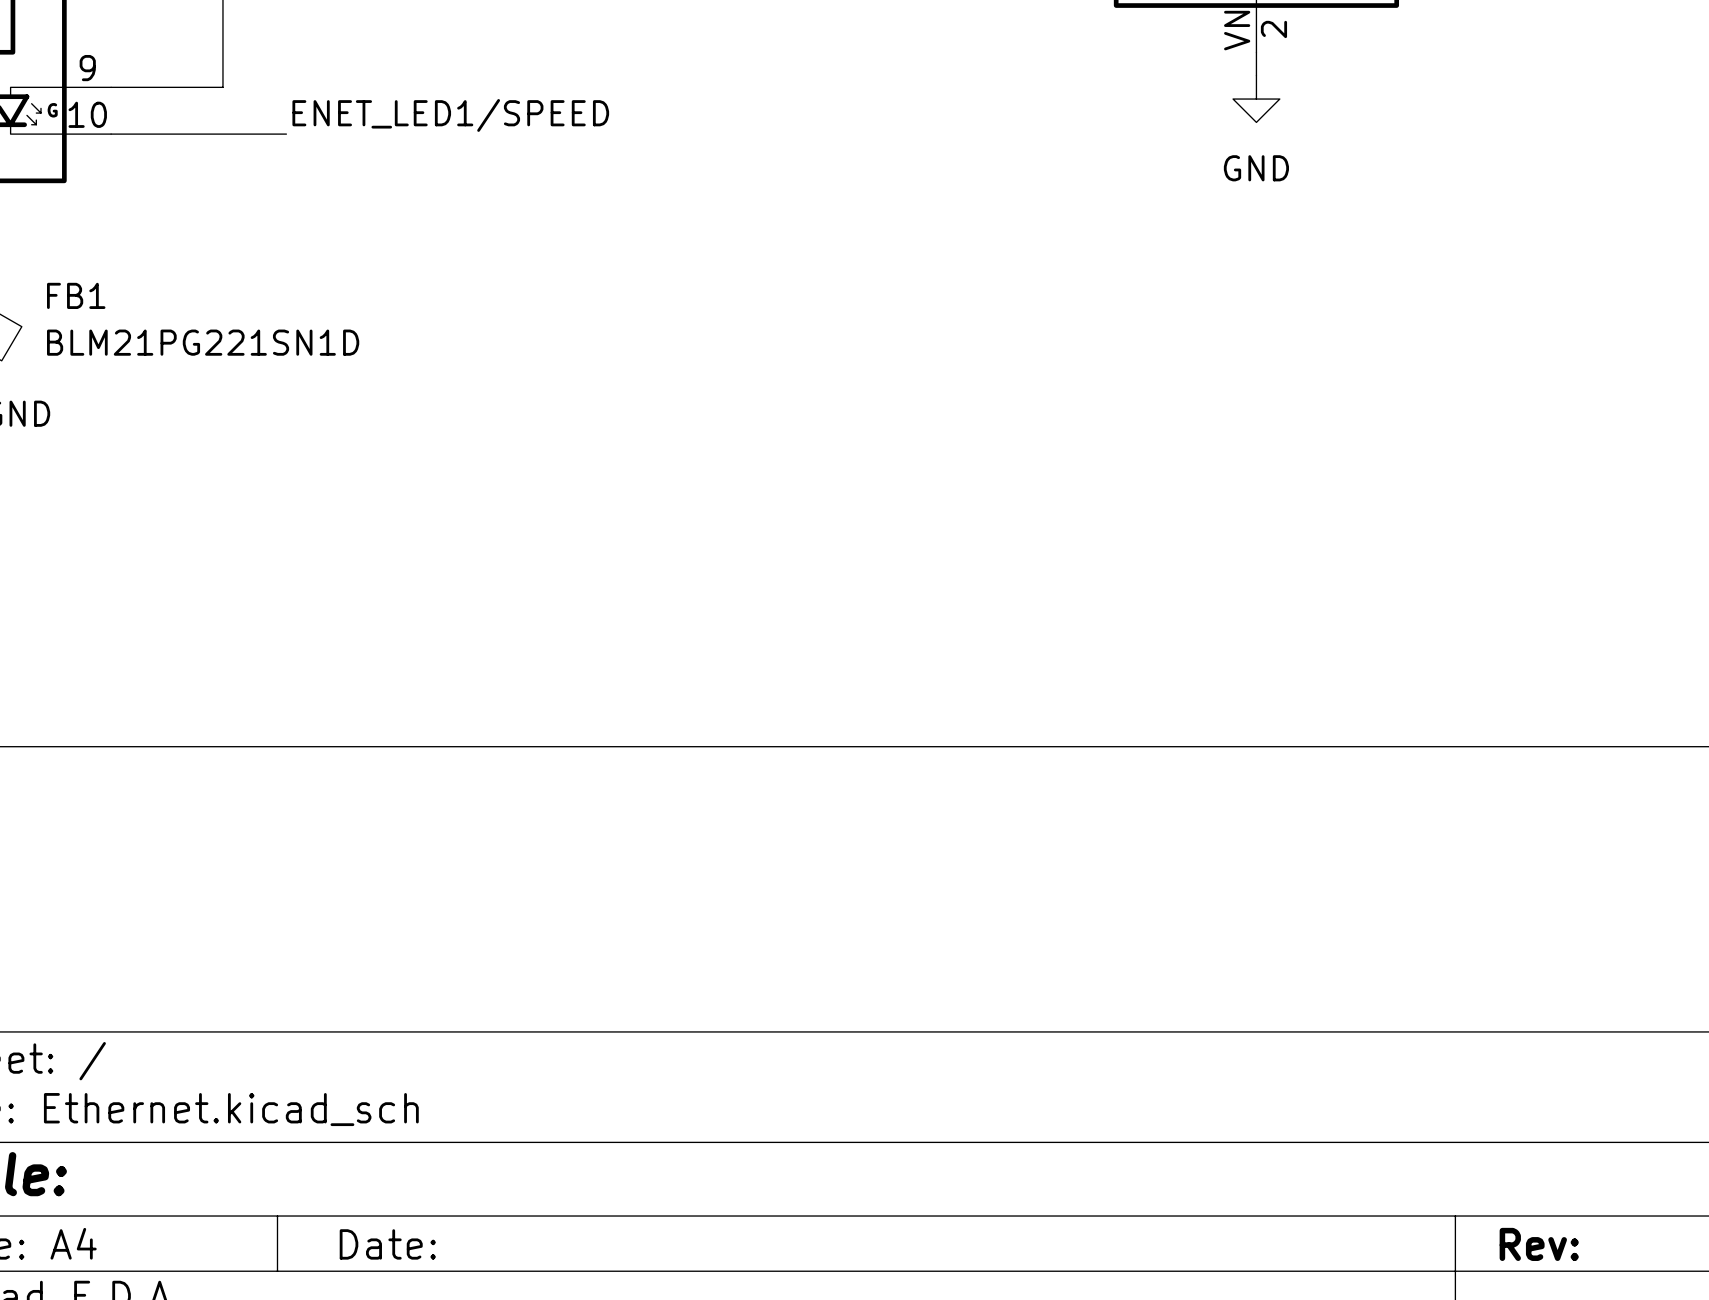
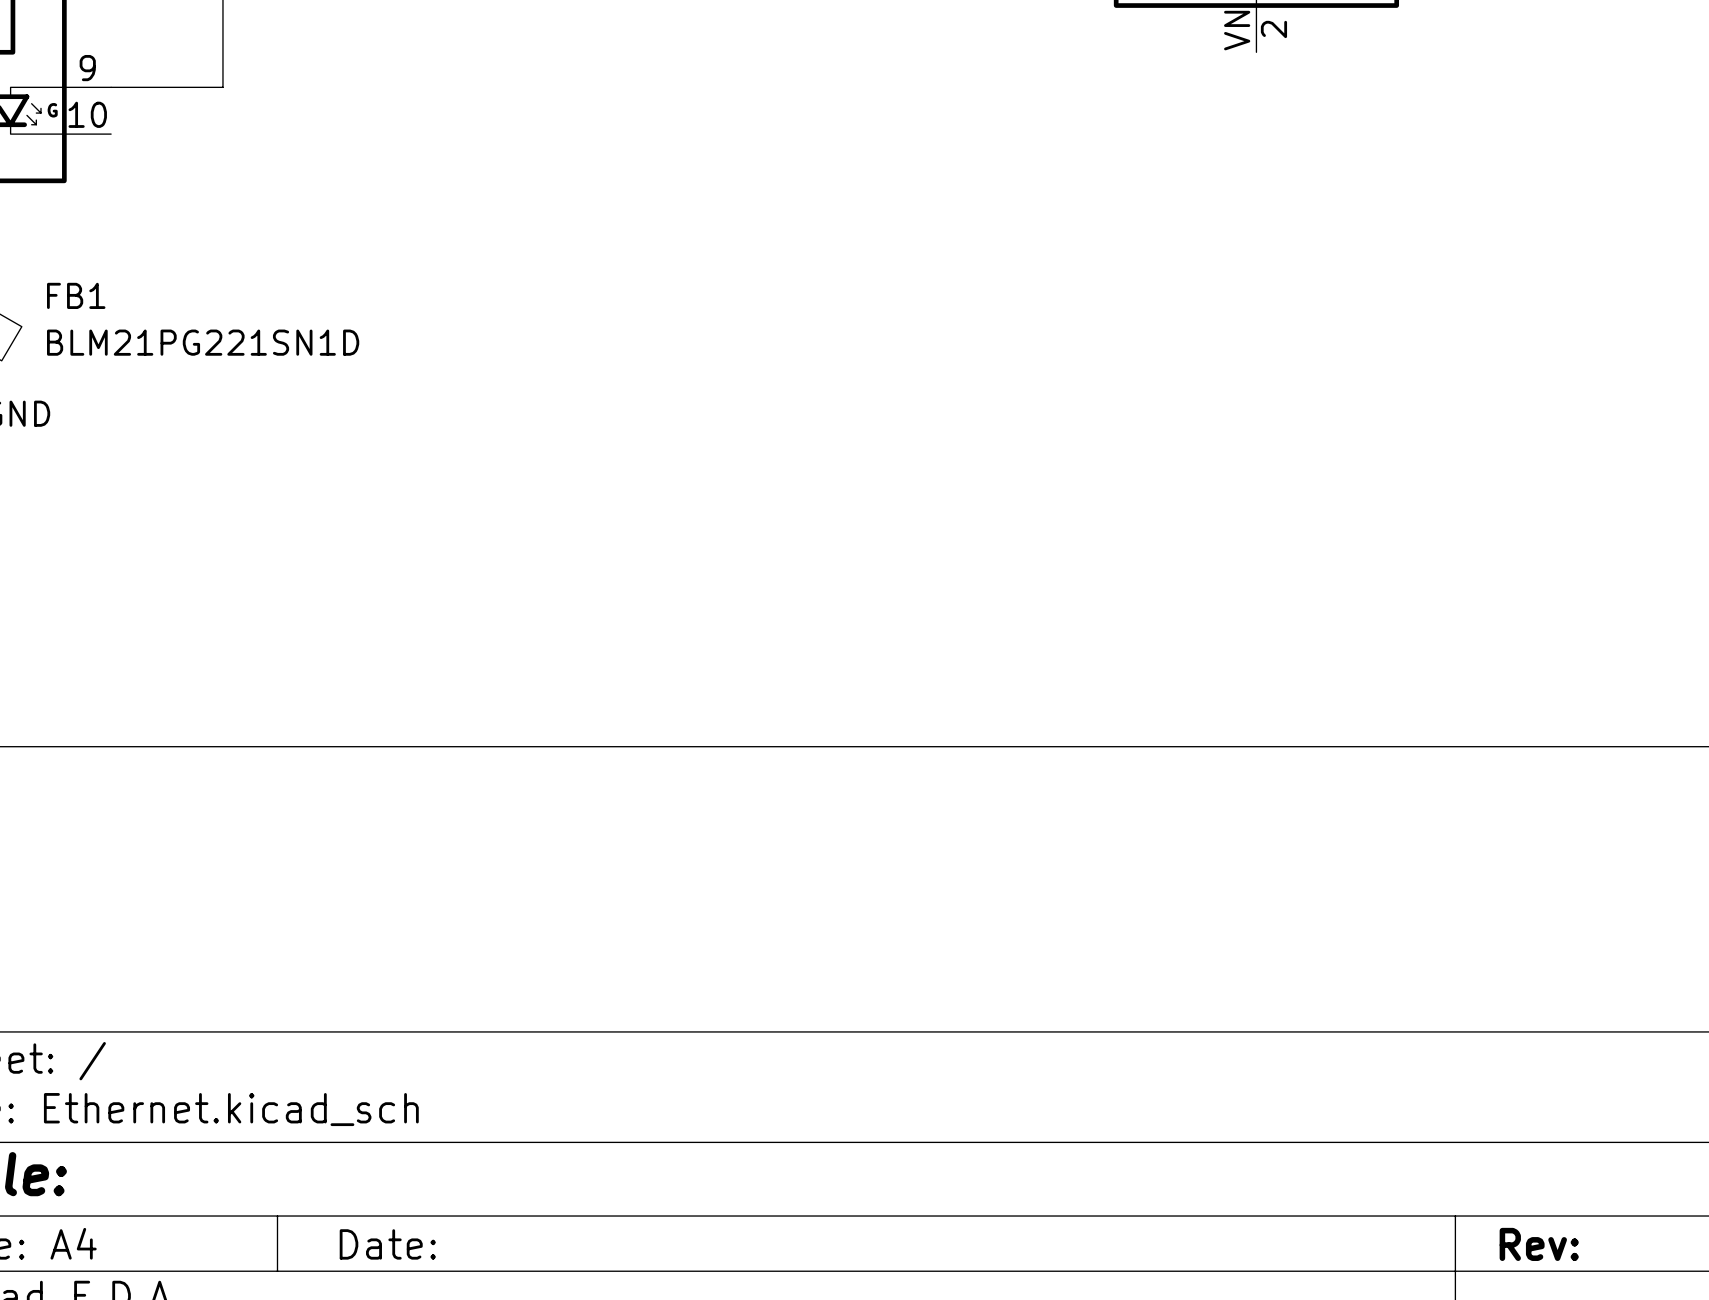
wire: (1256, 52) (1256, 75) -> none
power symbol: GND (1256, 99) -> none
label: ENET_LED1/SPEED (450, 115) -> none
wire: (111, 134) (286, 134) -> none

